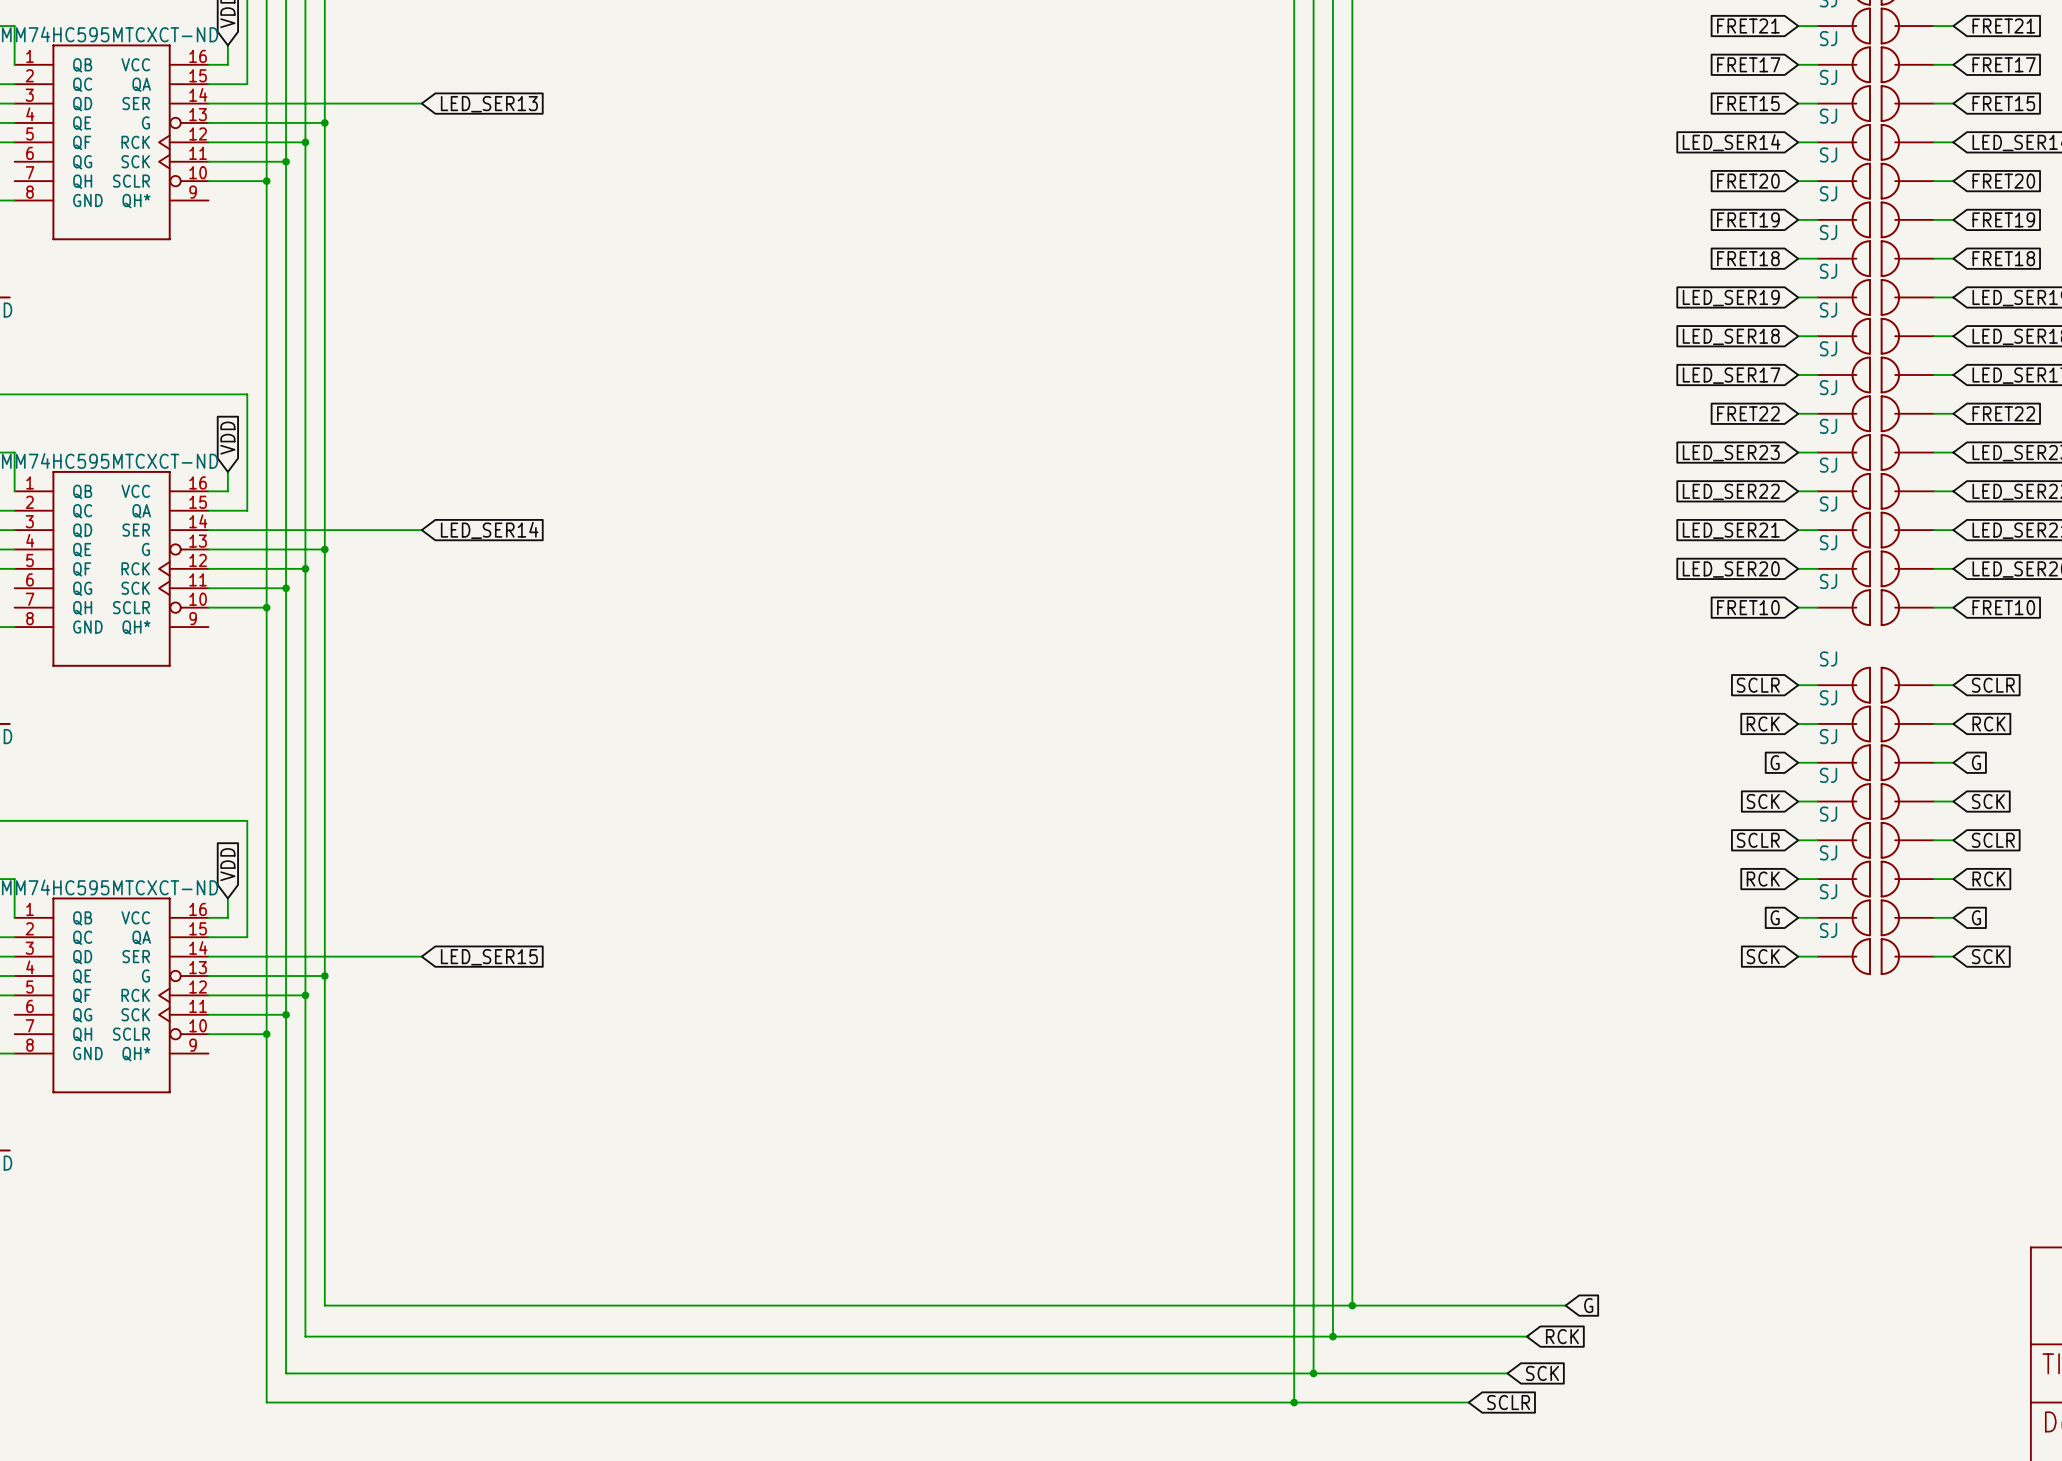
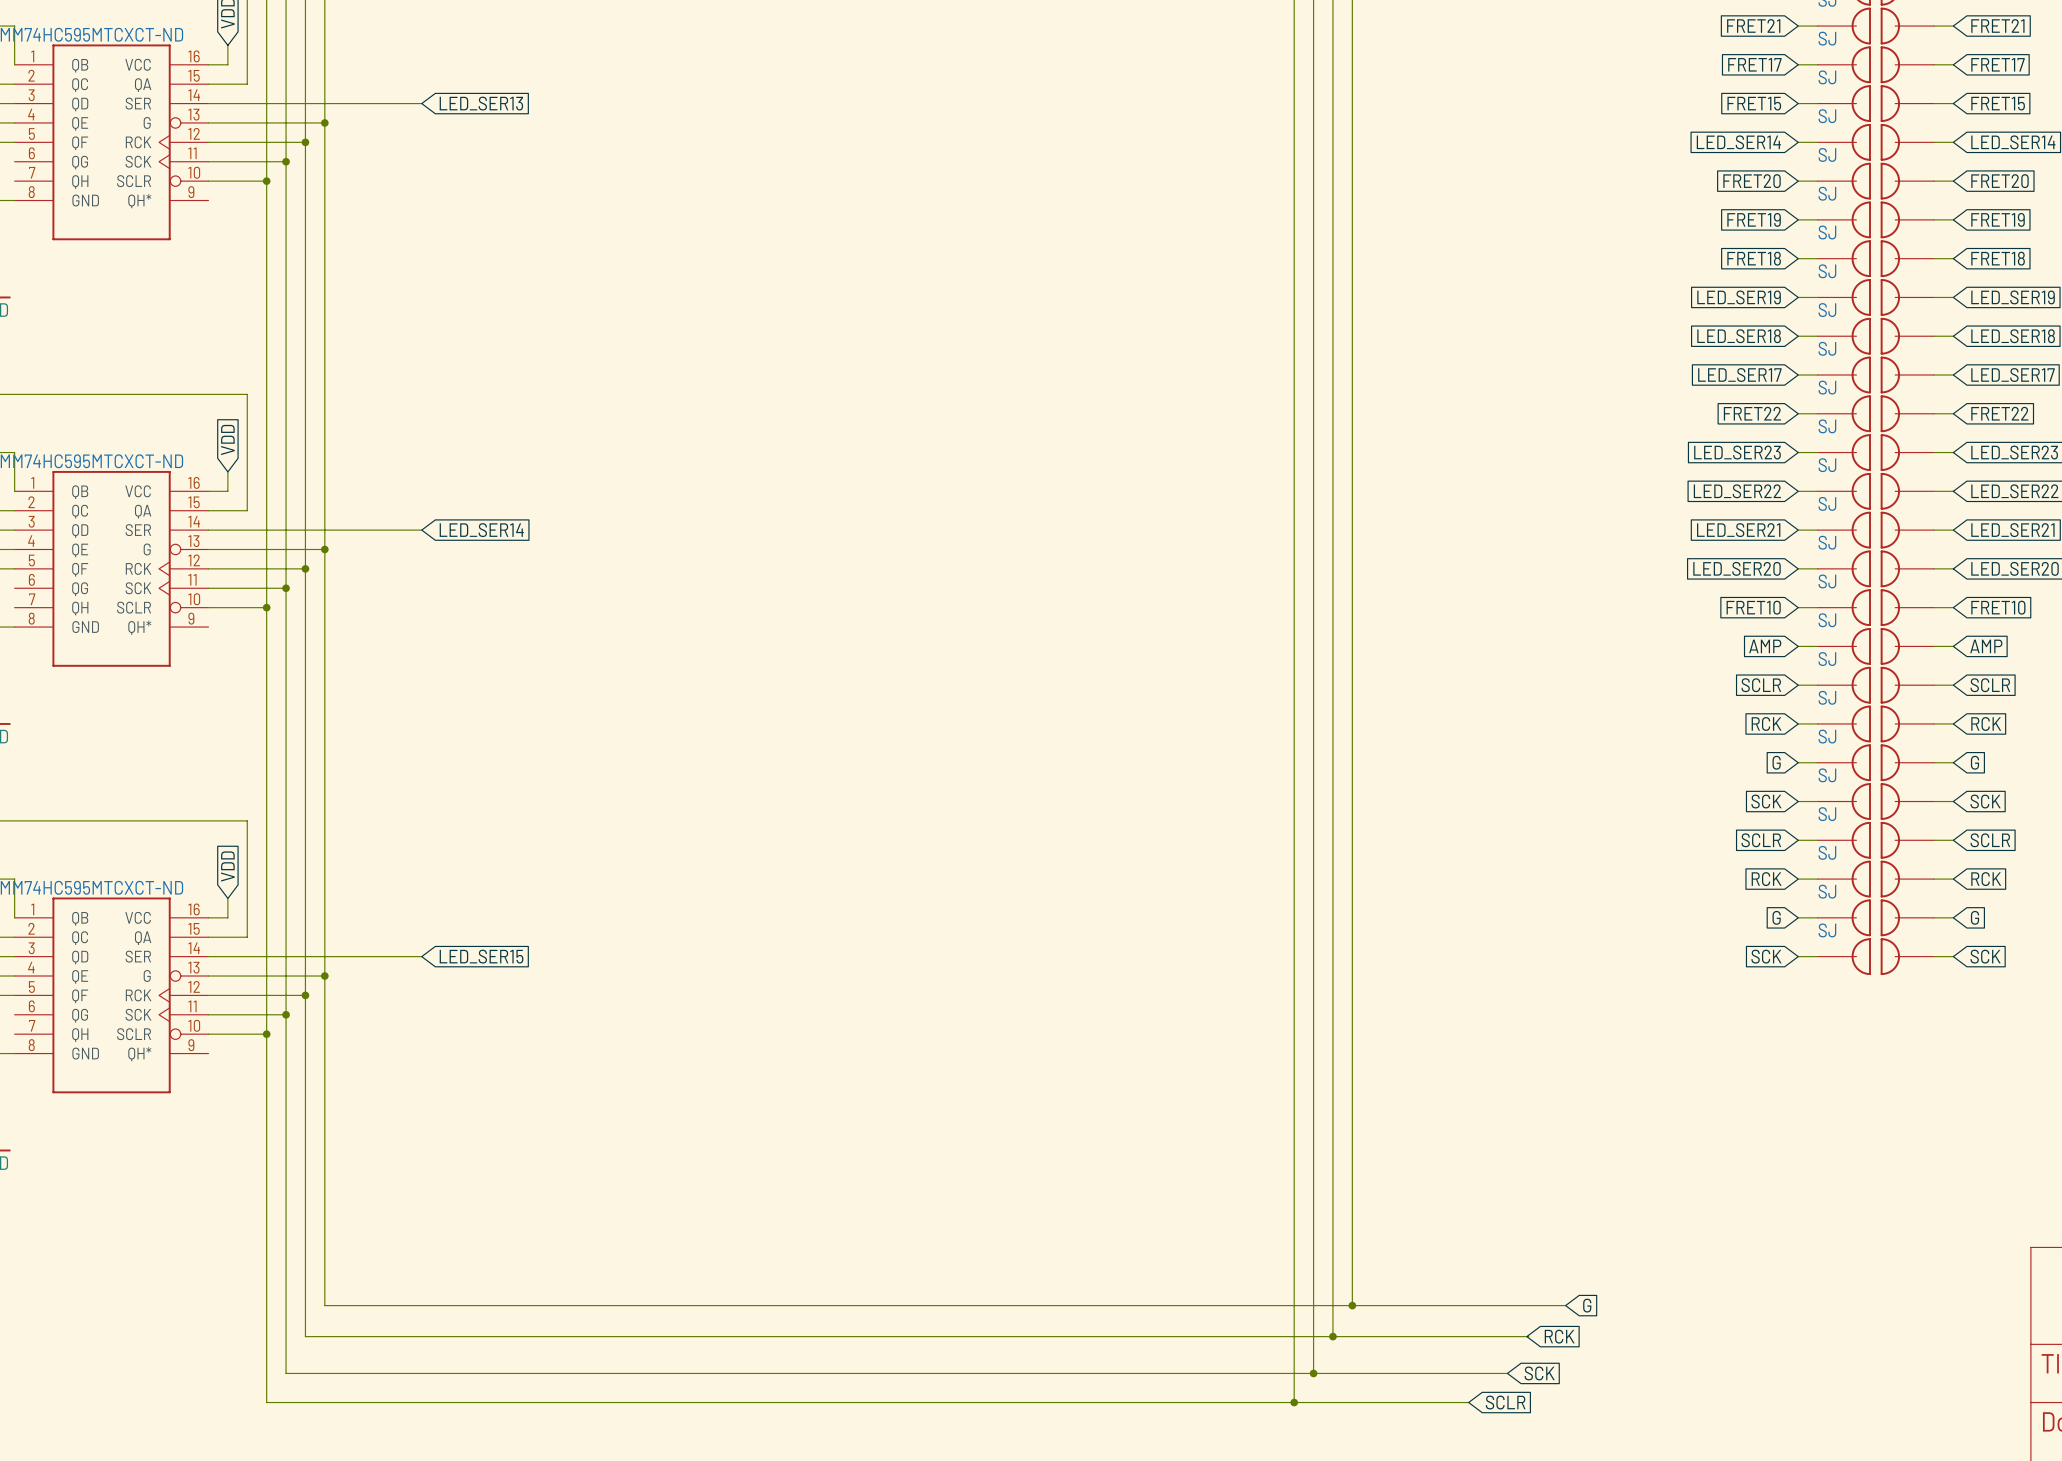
global label: none -> AMP (1765, 646)
wire: none -> (1798, 646) (1817, 646)
part: none -> (1875, 646)
wire: none -> (1933, 646) (1953, 646)
global label: none -> AMP (1986, 646)

